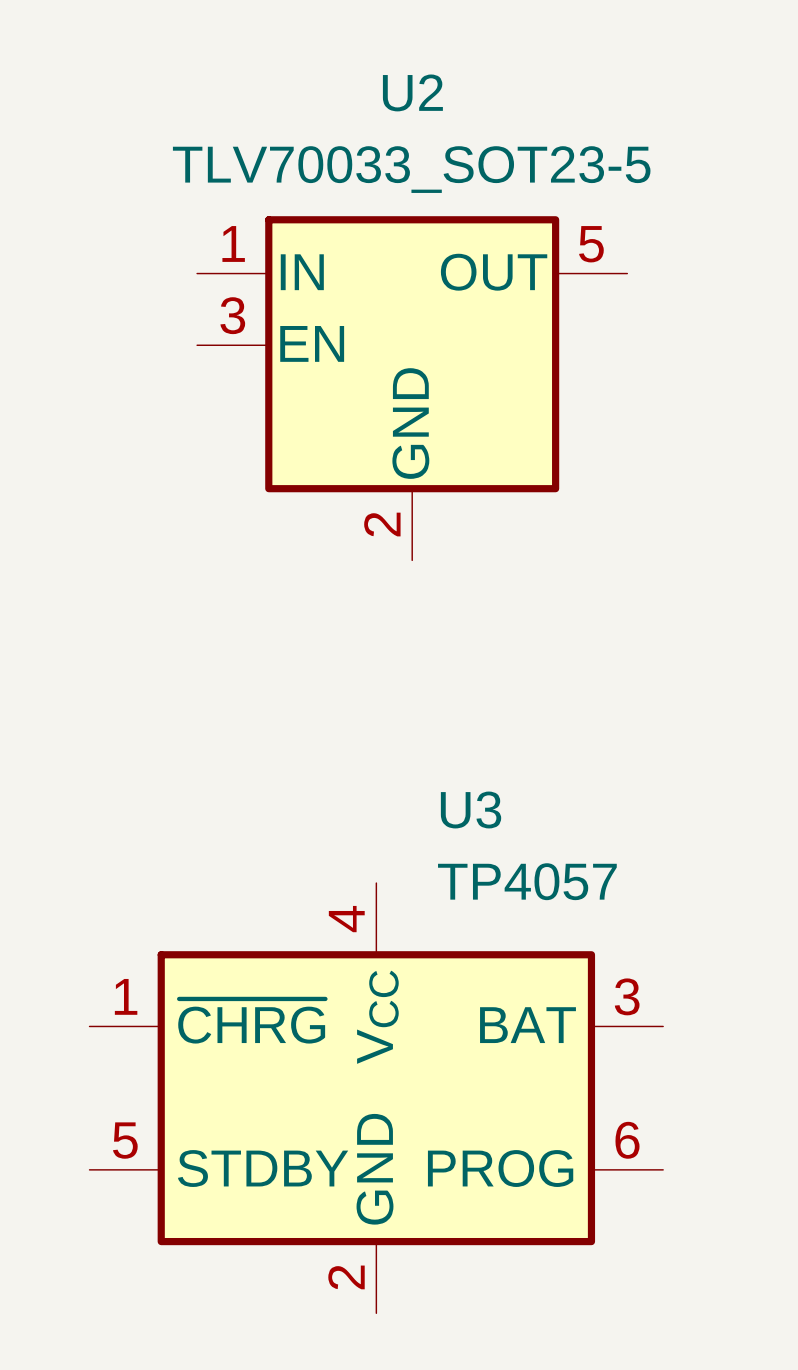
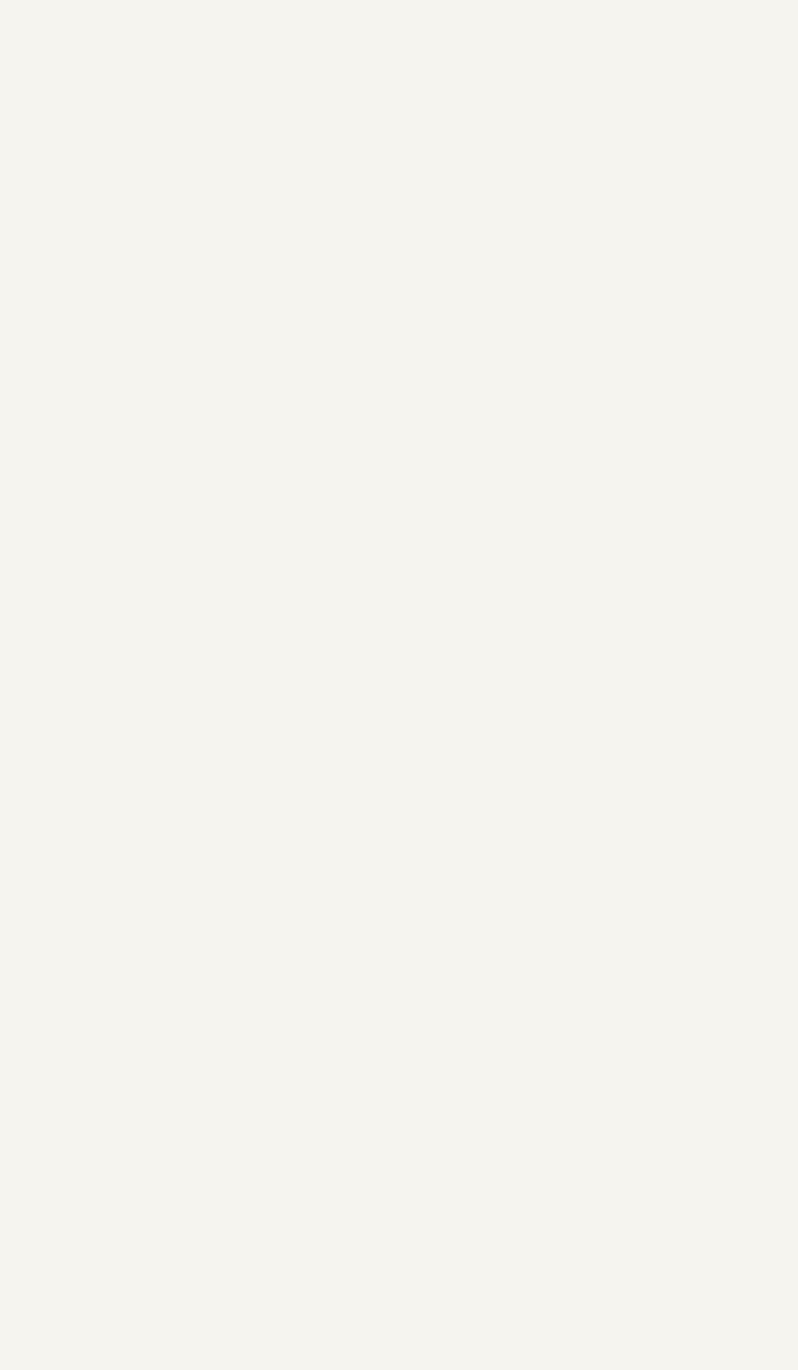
U2: TLV70033_SOT23-5 (412, 388) -> none
U3: TP4057 (376, 1098) -> none

